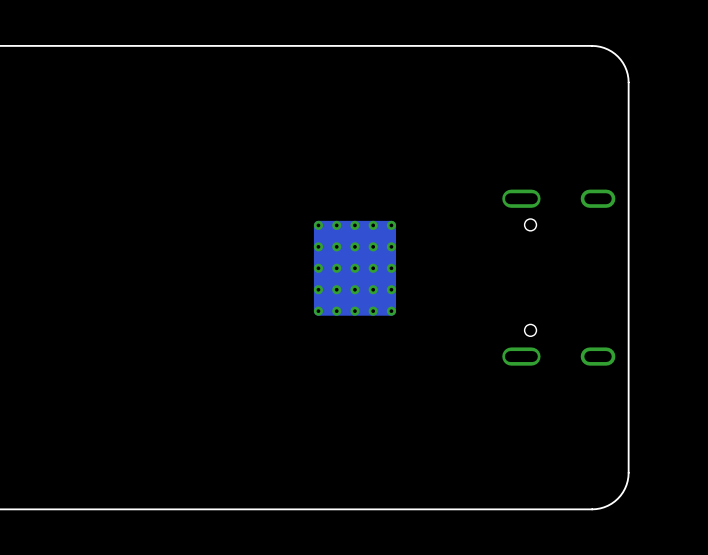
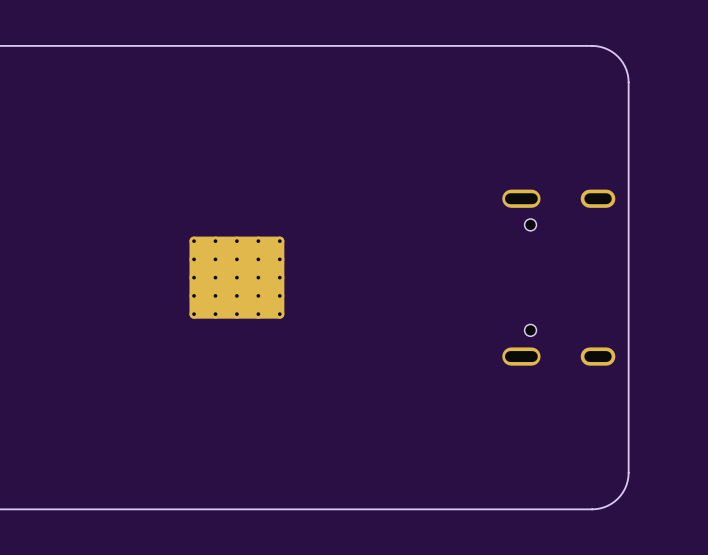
part rotation: 0° (354, 268) -> 90° clockwise (236, 277)
part position: (354, 268) -> (236, 277)

